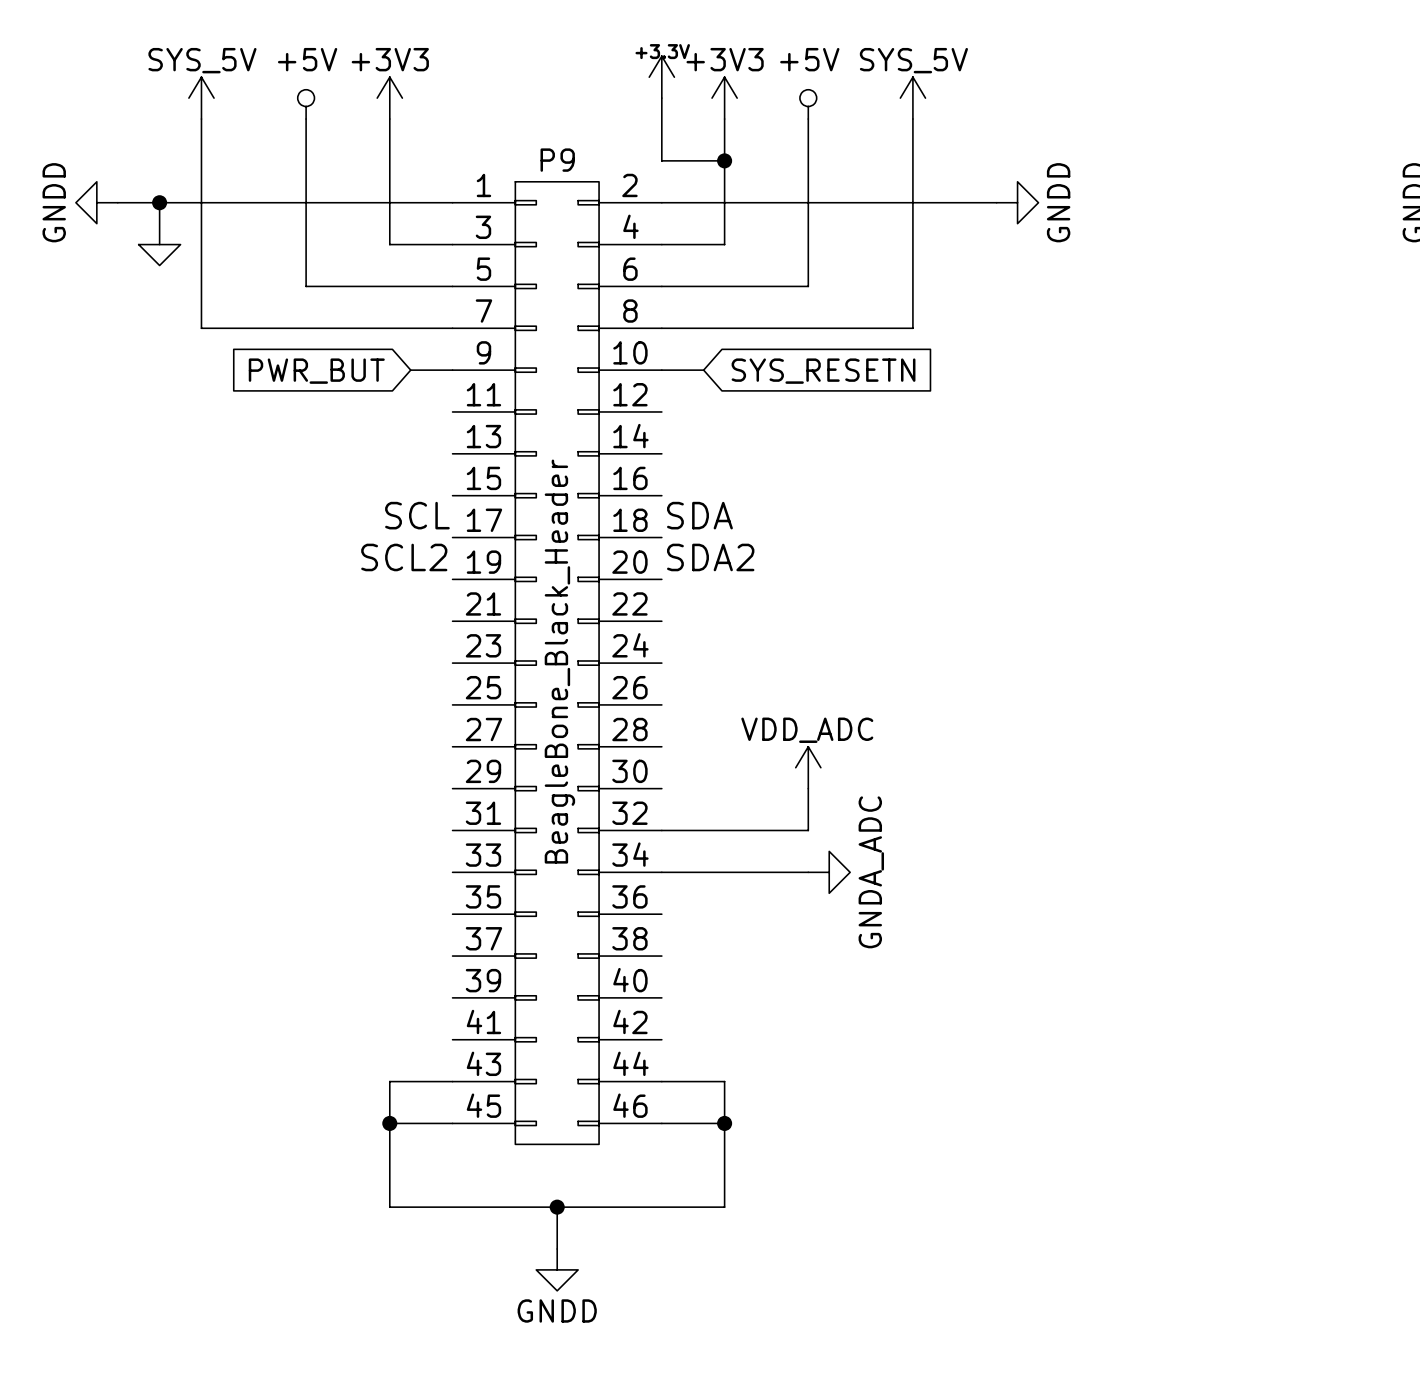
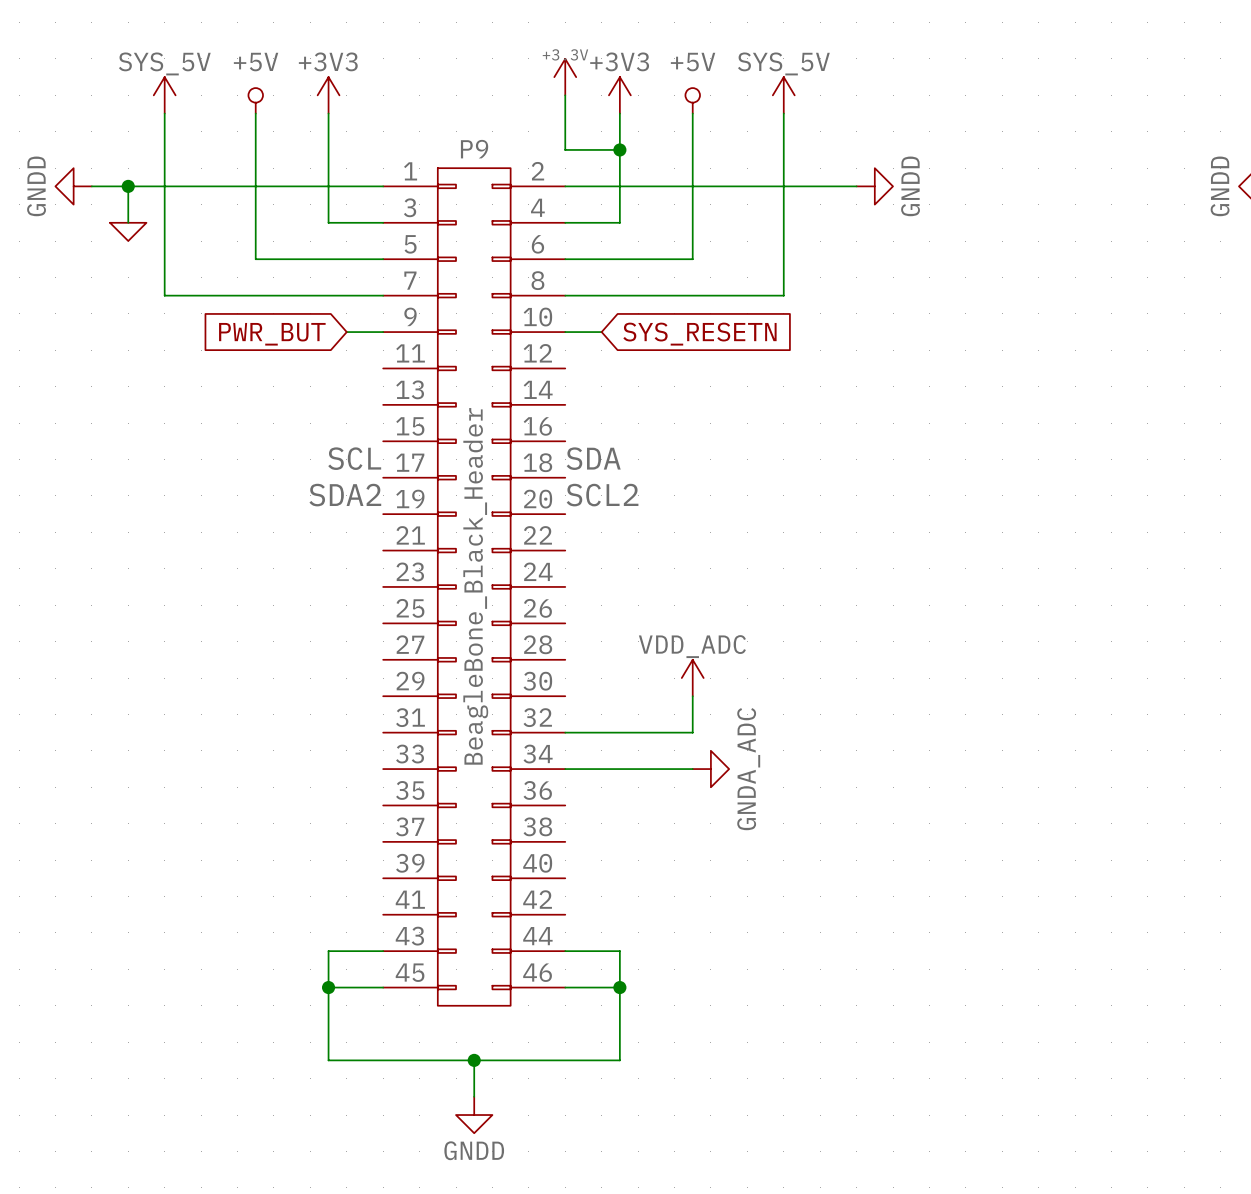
label: SCL2 (404, 557) -> SDA2 (345, 495)
label: SDA2 (710, 557) -> SCL2 (602, 495)

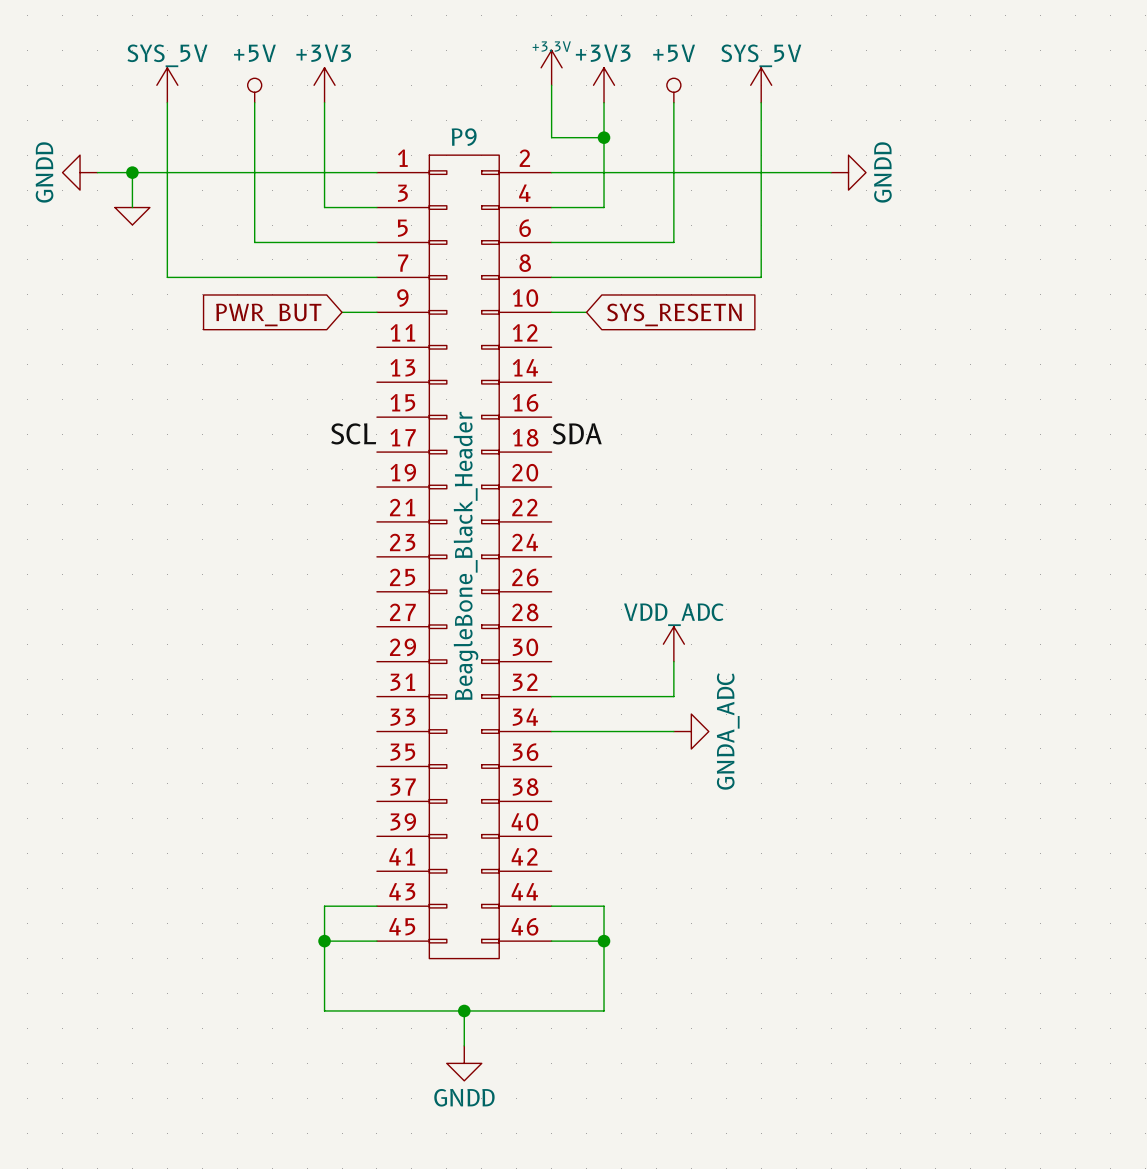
label: SDA2 (345, 495) -> none
label: SCL2 (602, 495) -> none

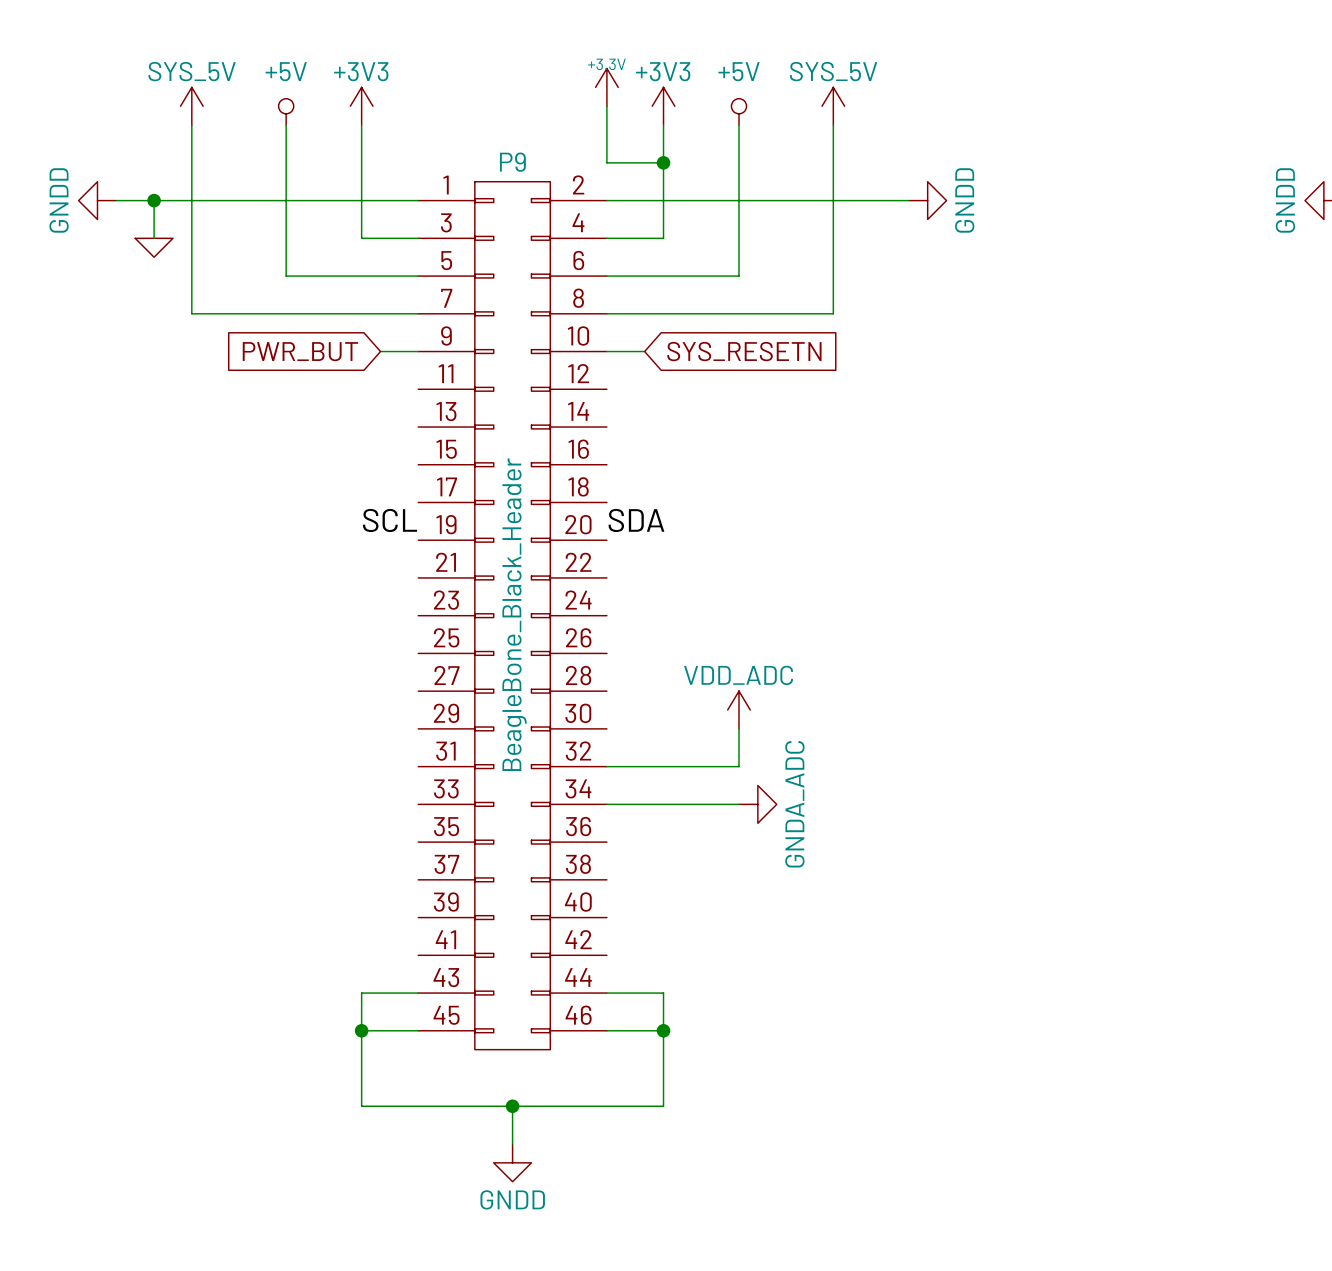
label position: SCL (353, 433) -> SCL (390, 520)
label position: SDA (577, 433) -> SDA (636, 520)

